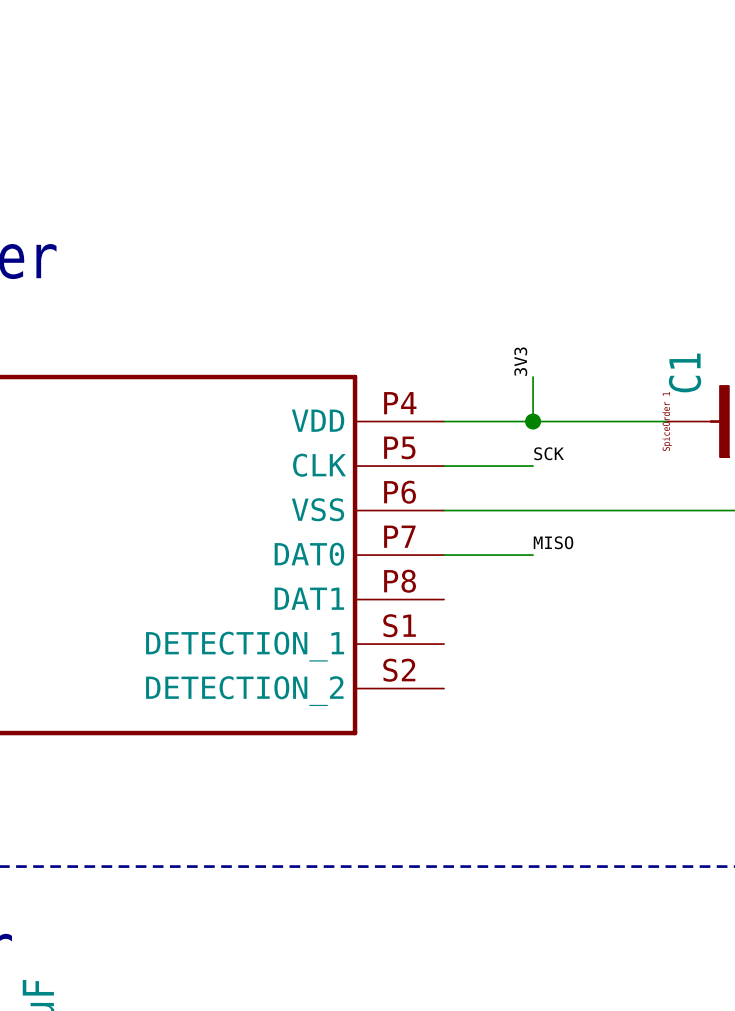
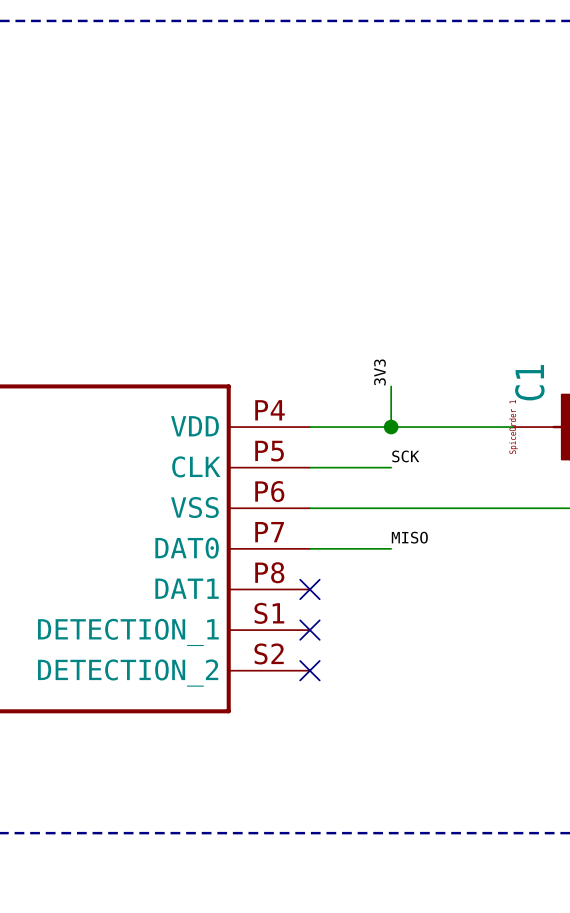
no-connect mark: none -> (309, 589)
no-connect mark: none -> (309, 630)
no-connect mark: none -> (309, 670)

